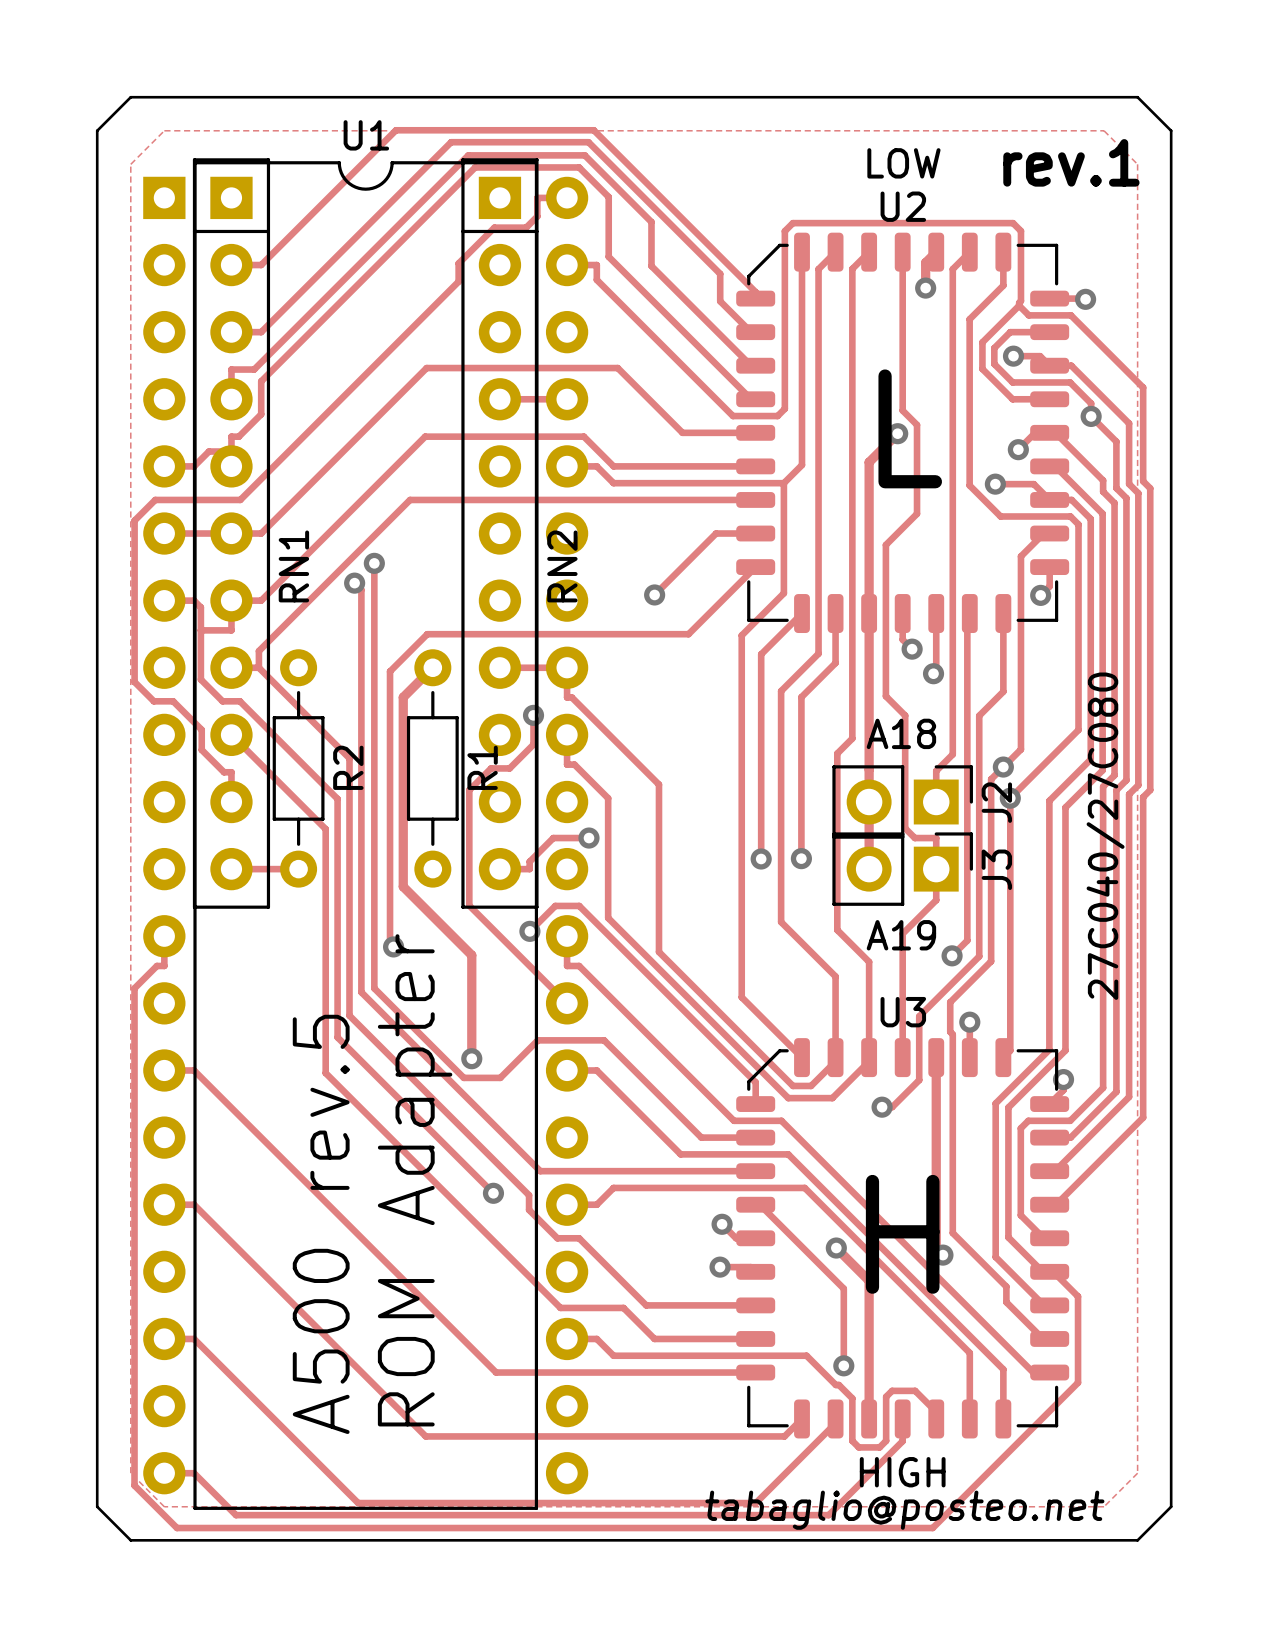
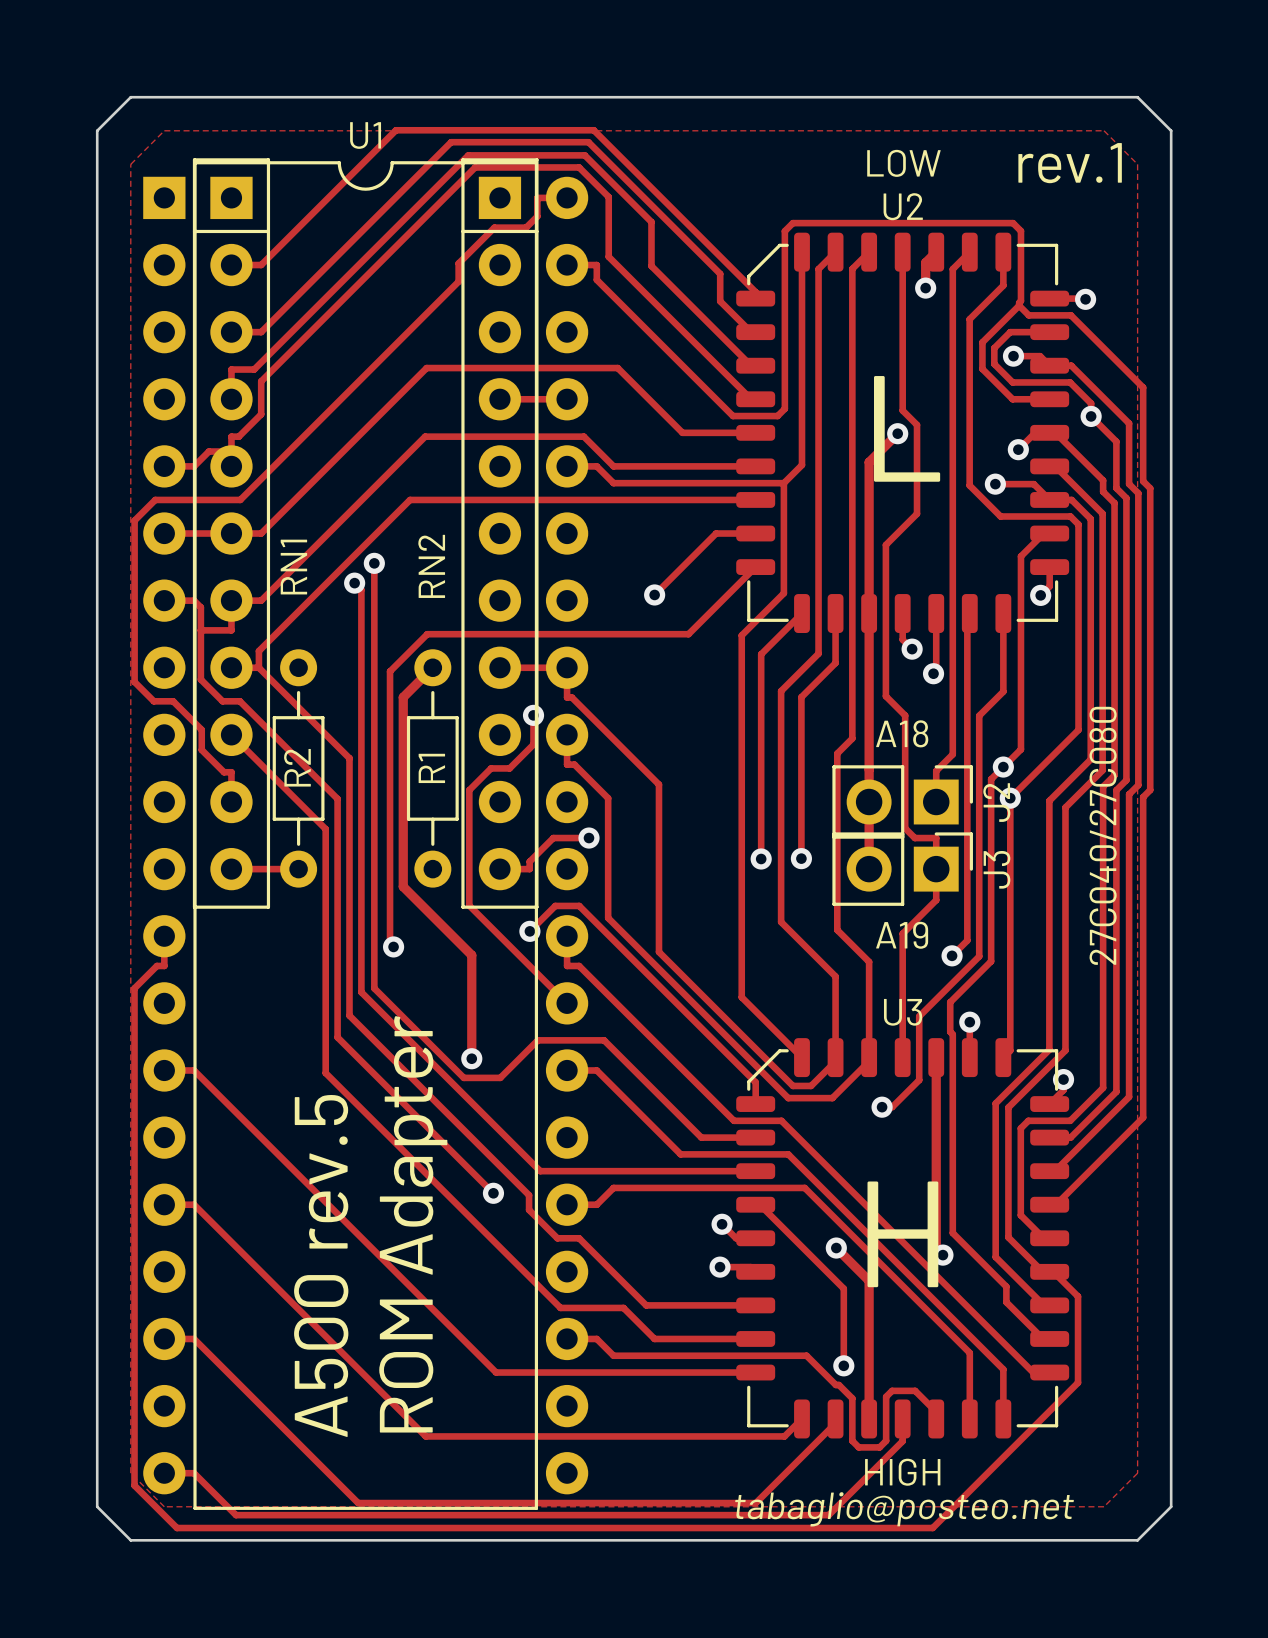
RN2 name position: RN2 (562, 566) -> RN2 (431, 566)
R2 name position: R2 (348, 767) -> R2 (297, 767)
R1 name position: R1 (482, 767) -> R1 (431, 768)

